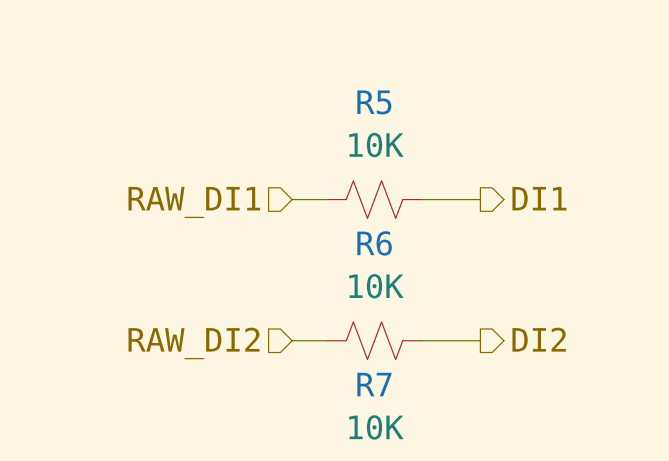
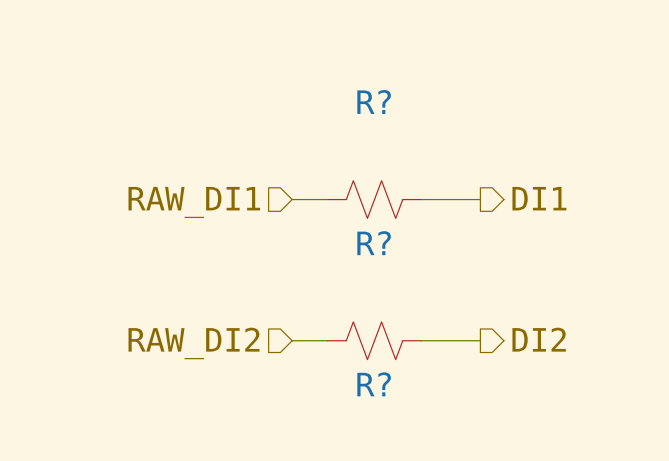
R5 name: R5 (374, 102) -> R? (374, 102)
R5 value: 10K (376, 145) -> none
R6 name: R6 (374, 243) -> R? (374, 243)
R6 value: 10K (376, 286) -> none
R7 name: R7 (374, 384) -> R? (374, 384)
R7 value: 10K (376, 427) -> none

